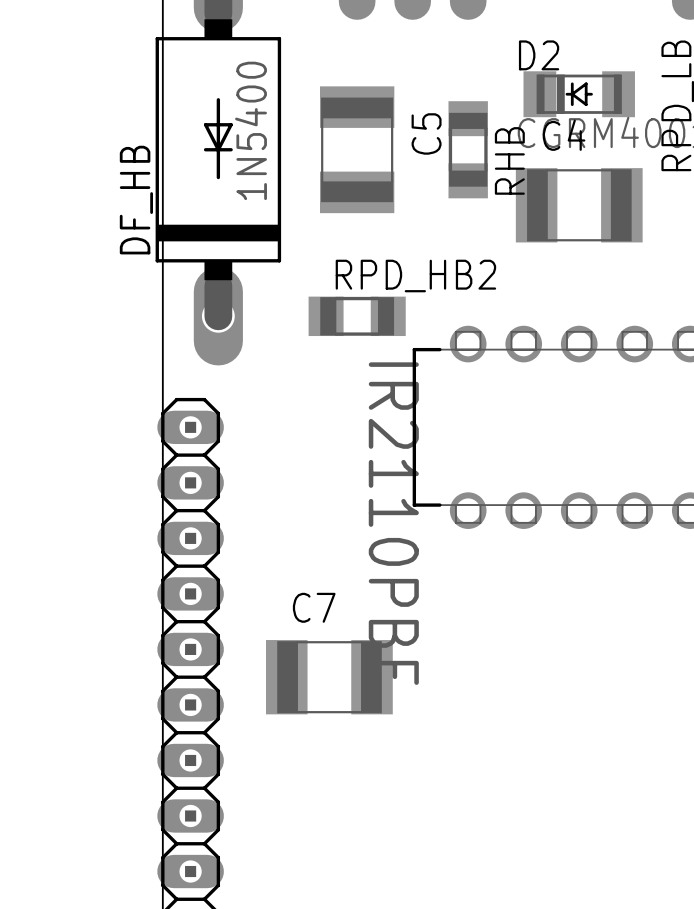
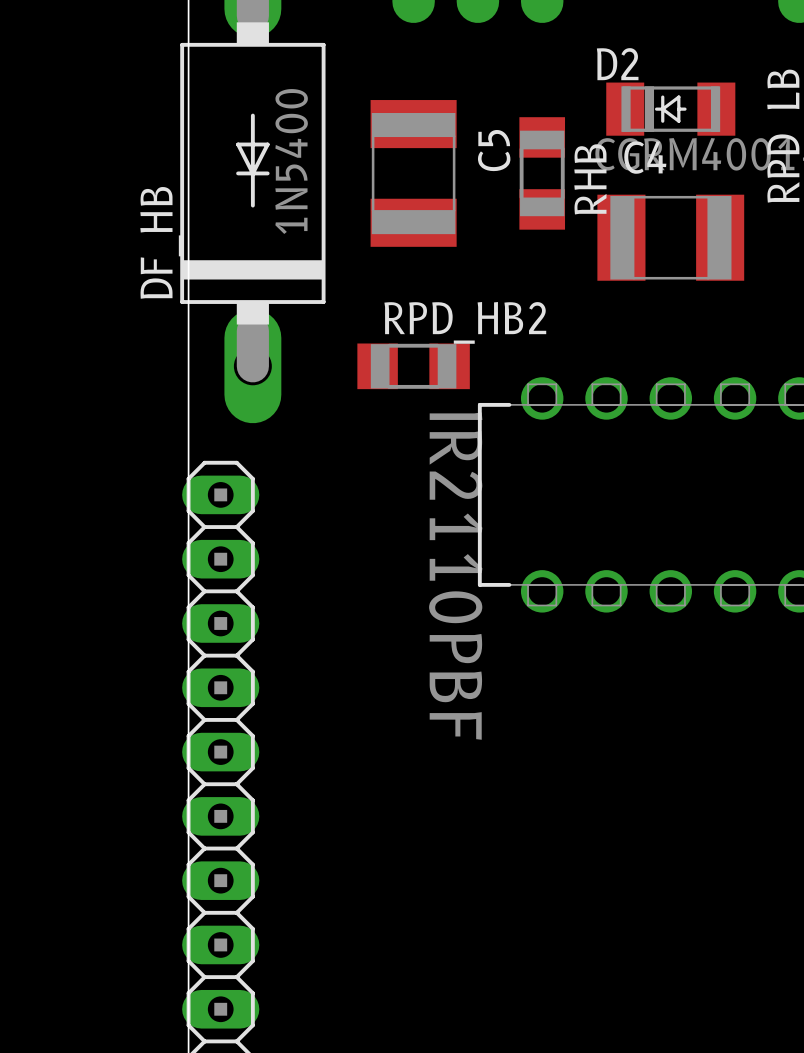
C7: (329, 677) -> none

